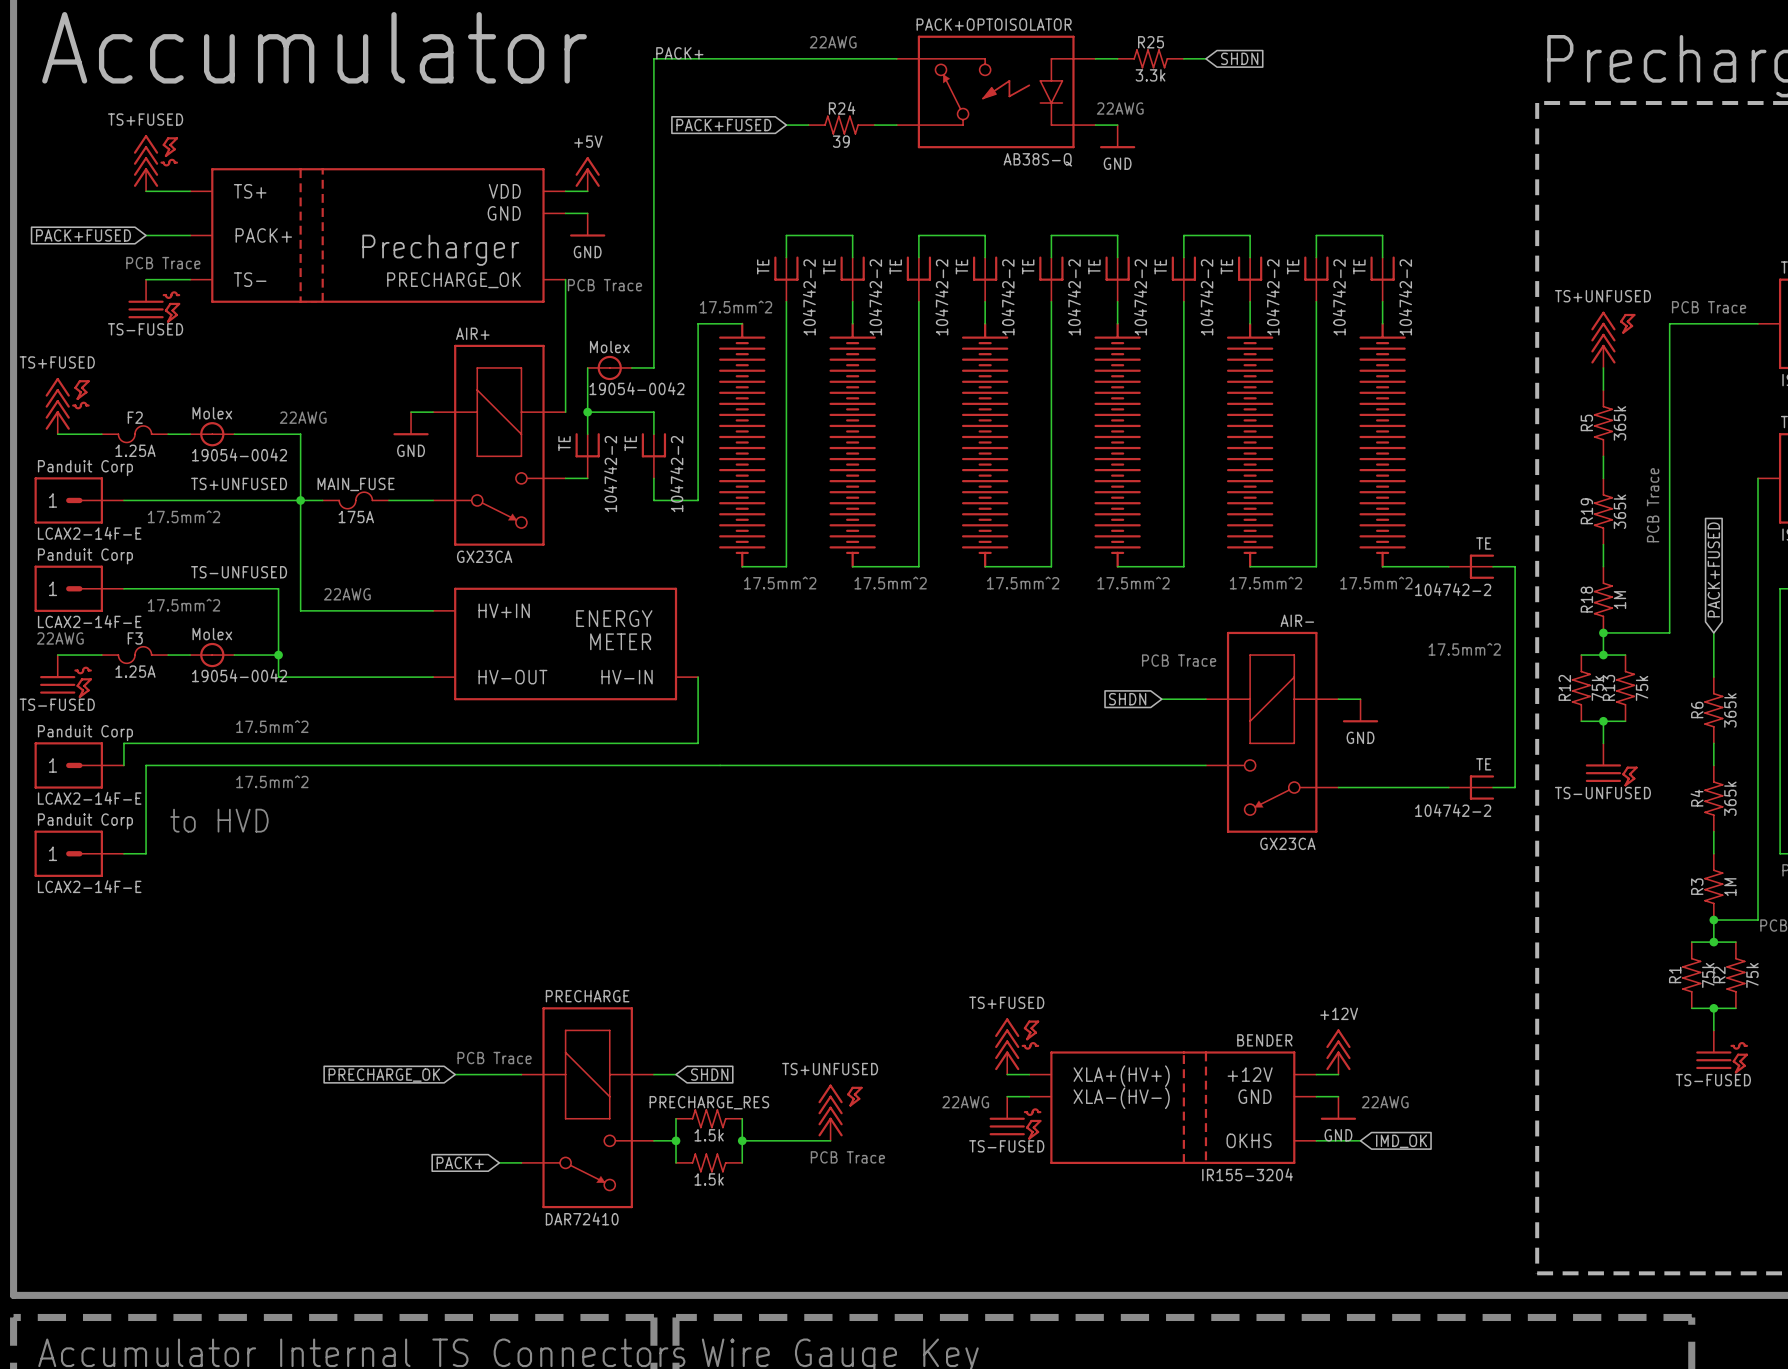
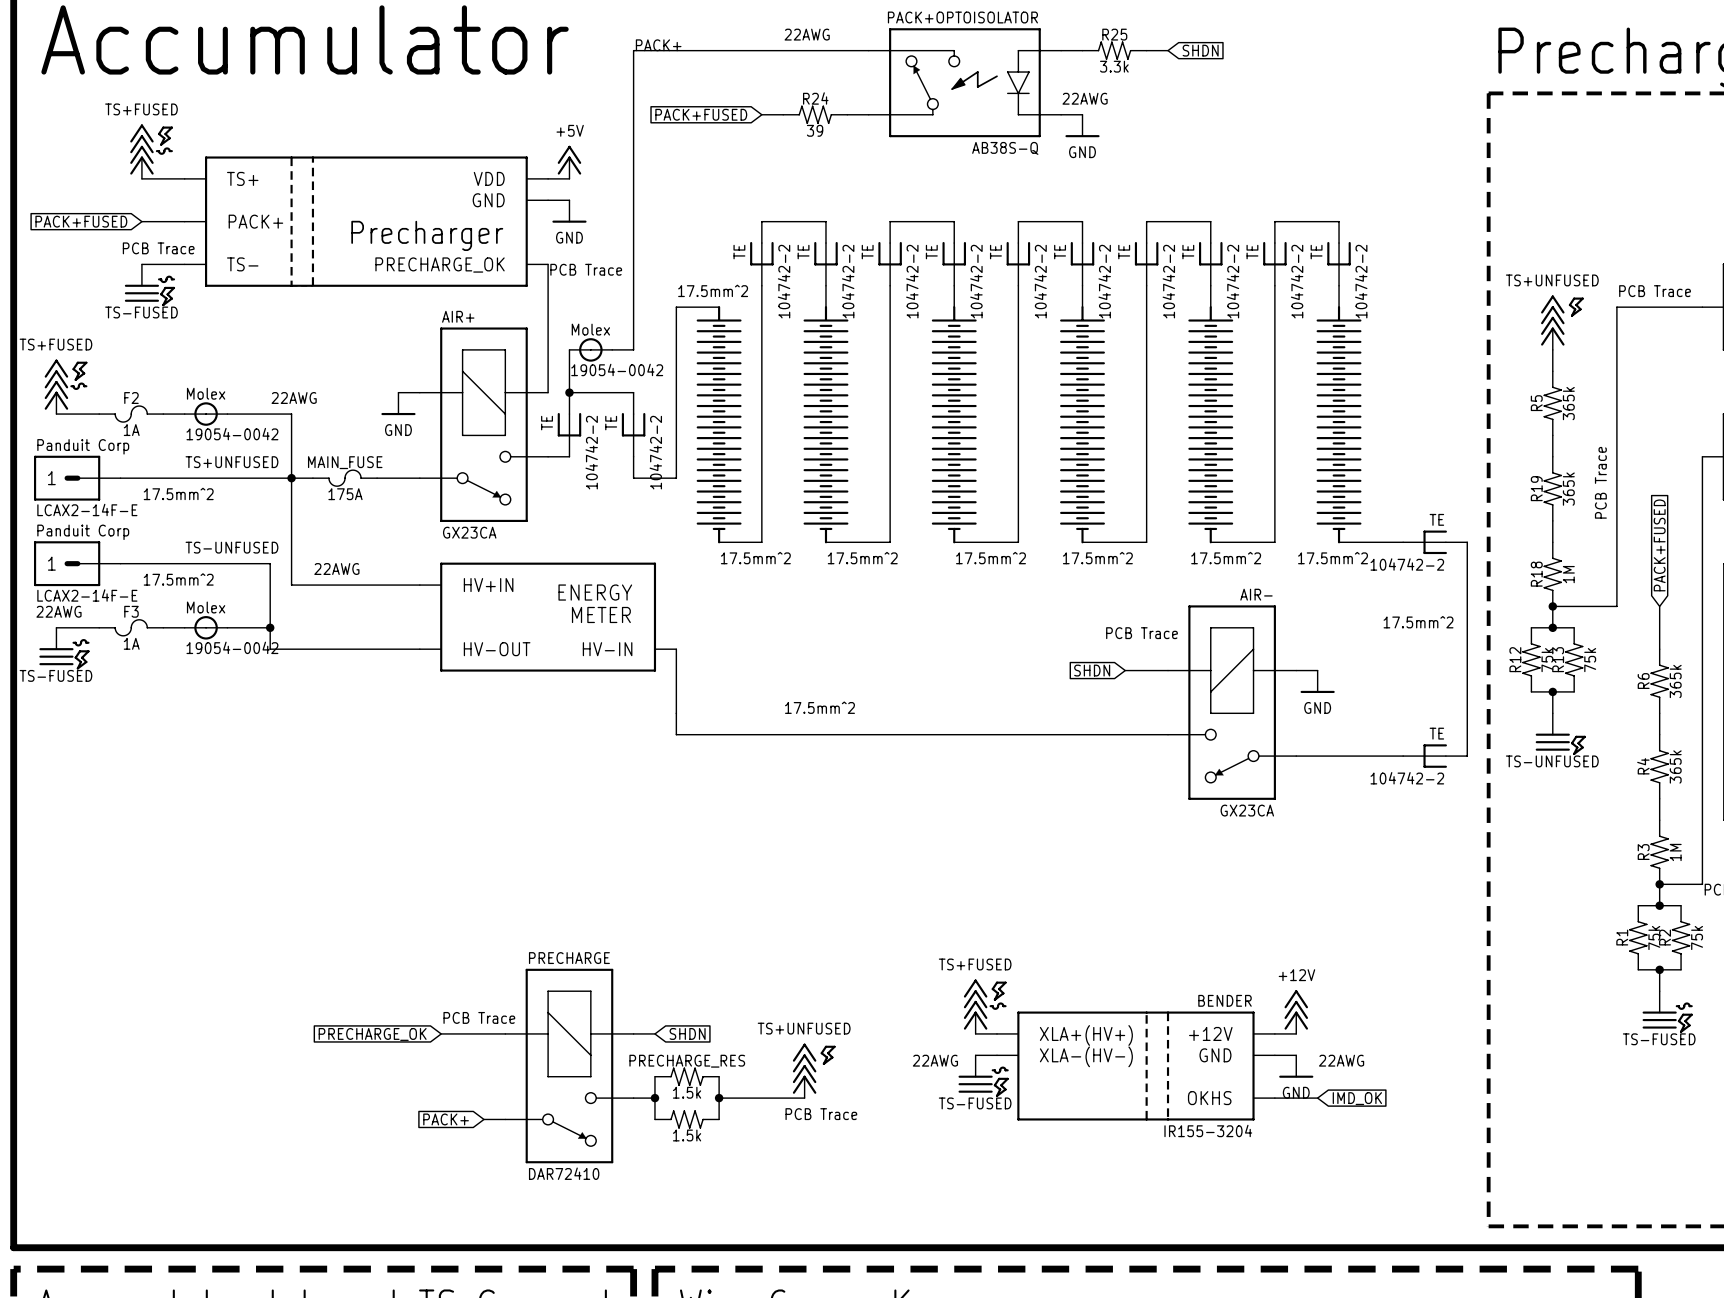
F2 value: 1.25A (135, 450) -> 1A (131, 430)
F3 value: 1.25A (135, 671) -> 1A (131, 643)
text: 17.5mm^2 (272, 726) -> none
text: none -> 17.5mm^2 (819, 707)
wire: (698, 743) (123, 743) (123, 765) -> (676, 713) (676, 734)
part: (79, 765) -> none
wire: (698, 765) (146, 765) (146, 853) (123, 853) -> none
text: 17.5mm^2 (272, 781) -> none
text: to HVD (219, 820) -> none
part: (79, 853) -> none

